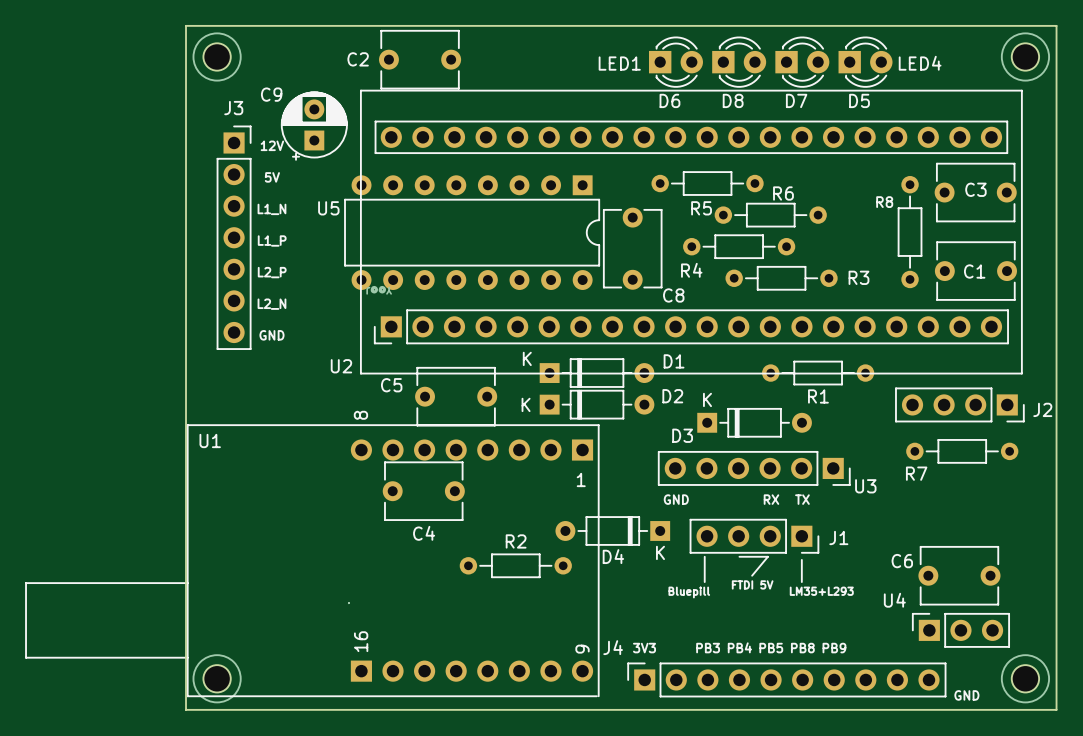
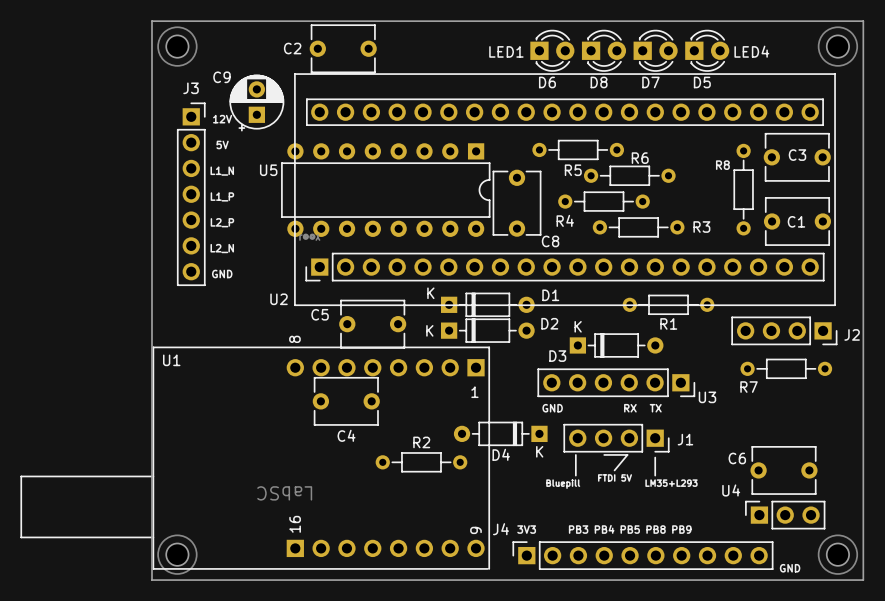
U1 footprint: [25, 424, 600, 698] -> [20, 346, 490, 570]

